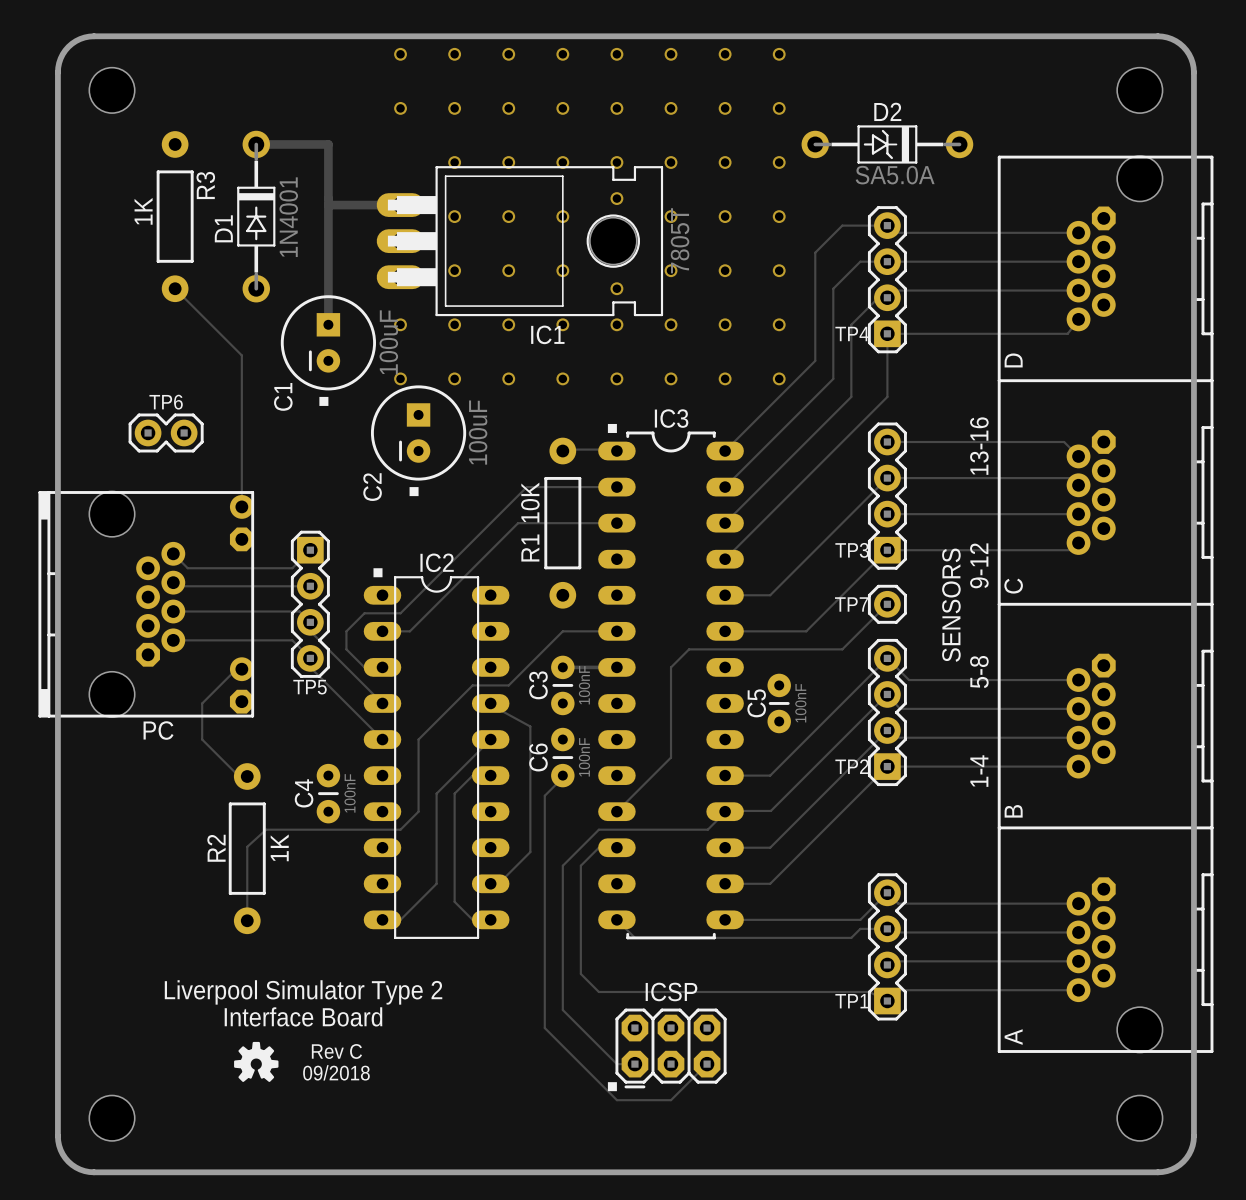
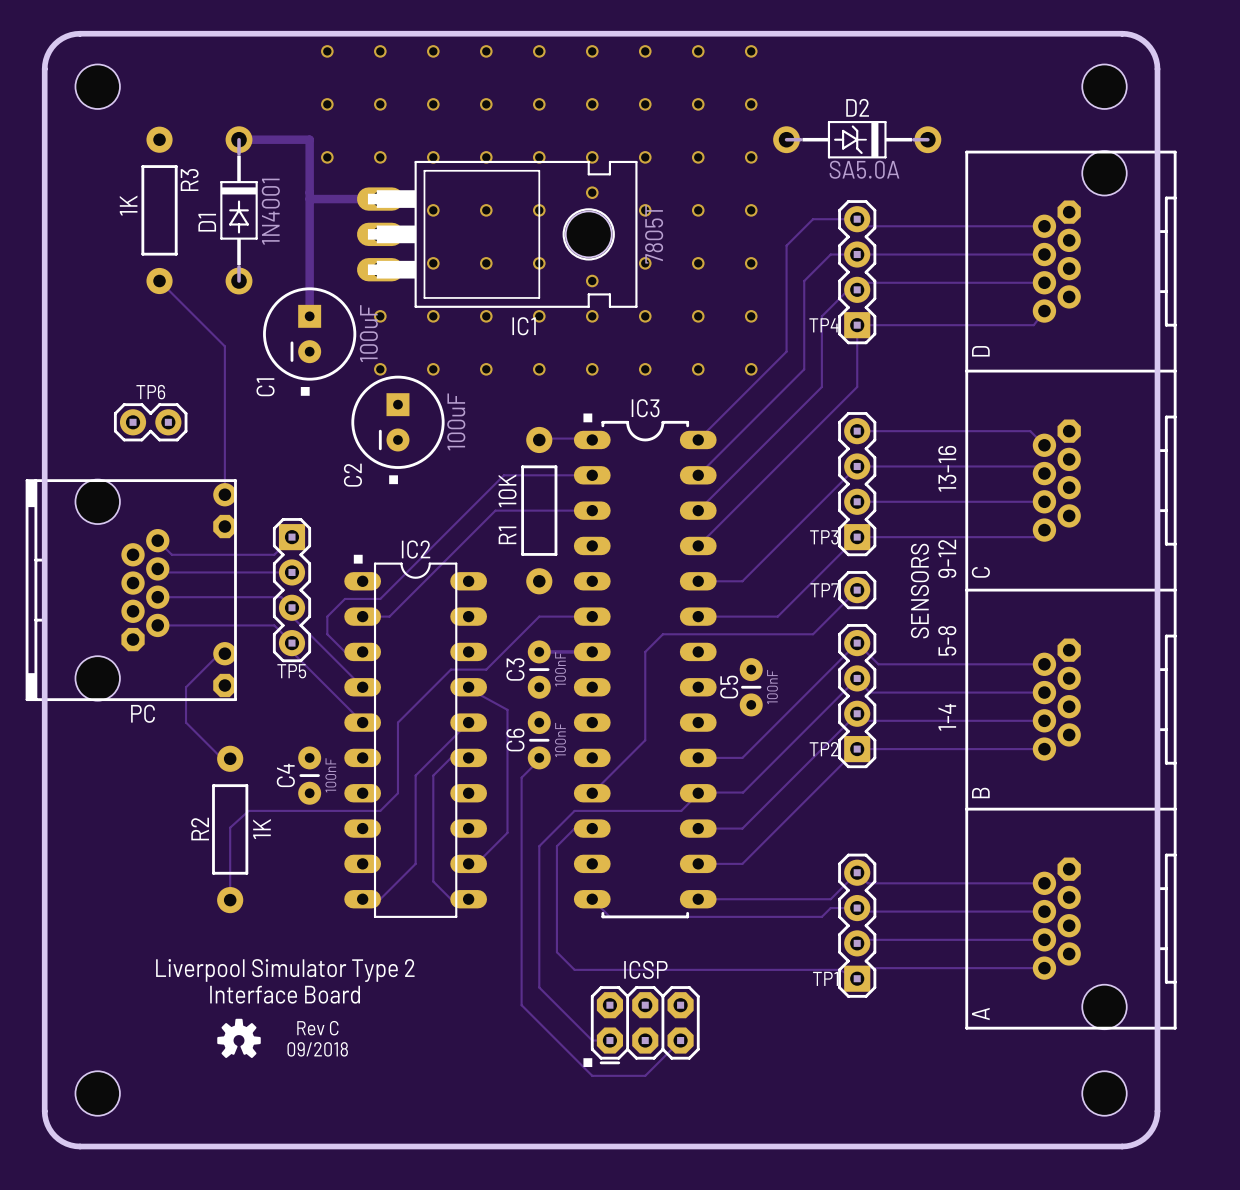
via: none -> (327, 51)
via: none -> (327, 104)
via: none -> (327, 157)
via: none -> (380, 157)

